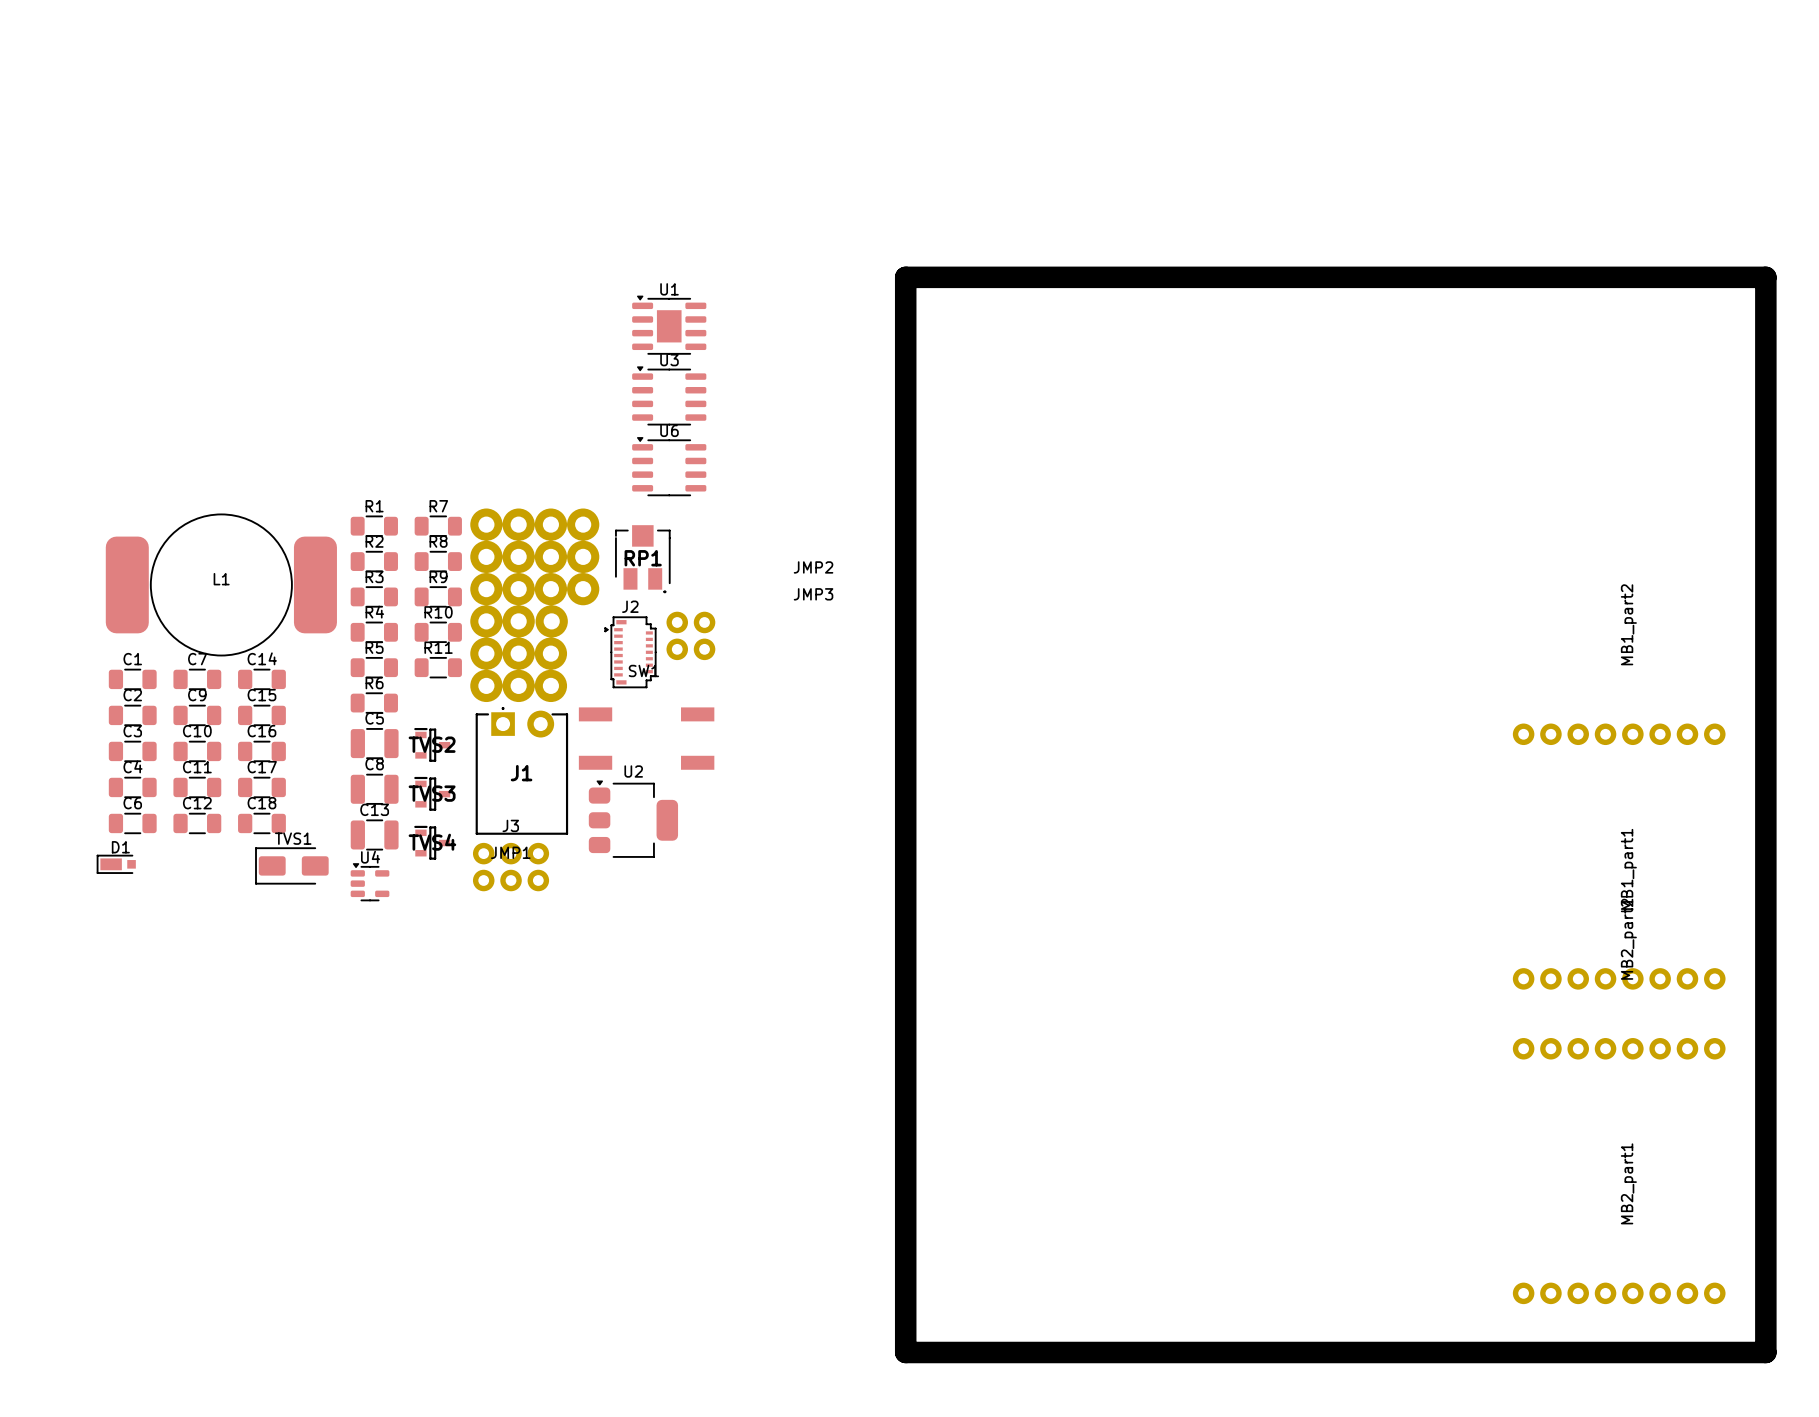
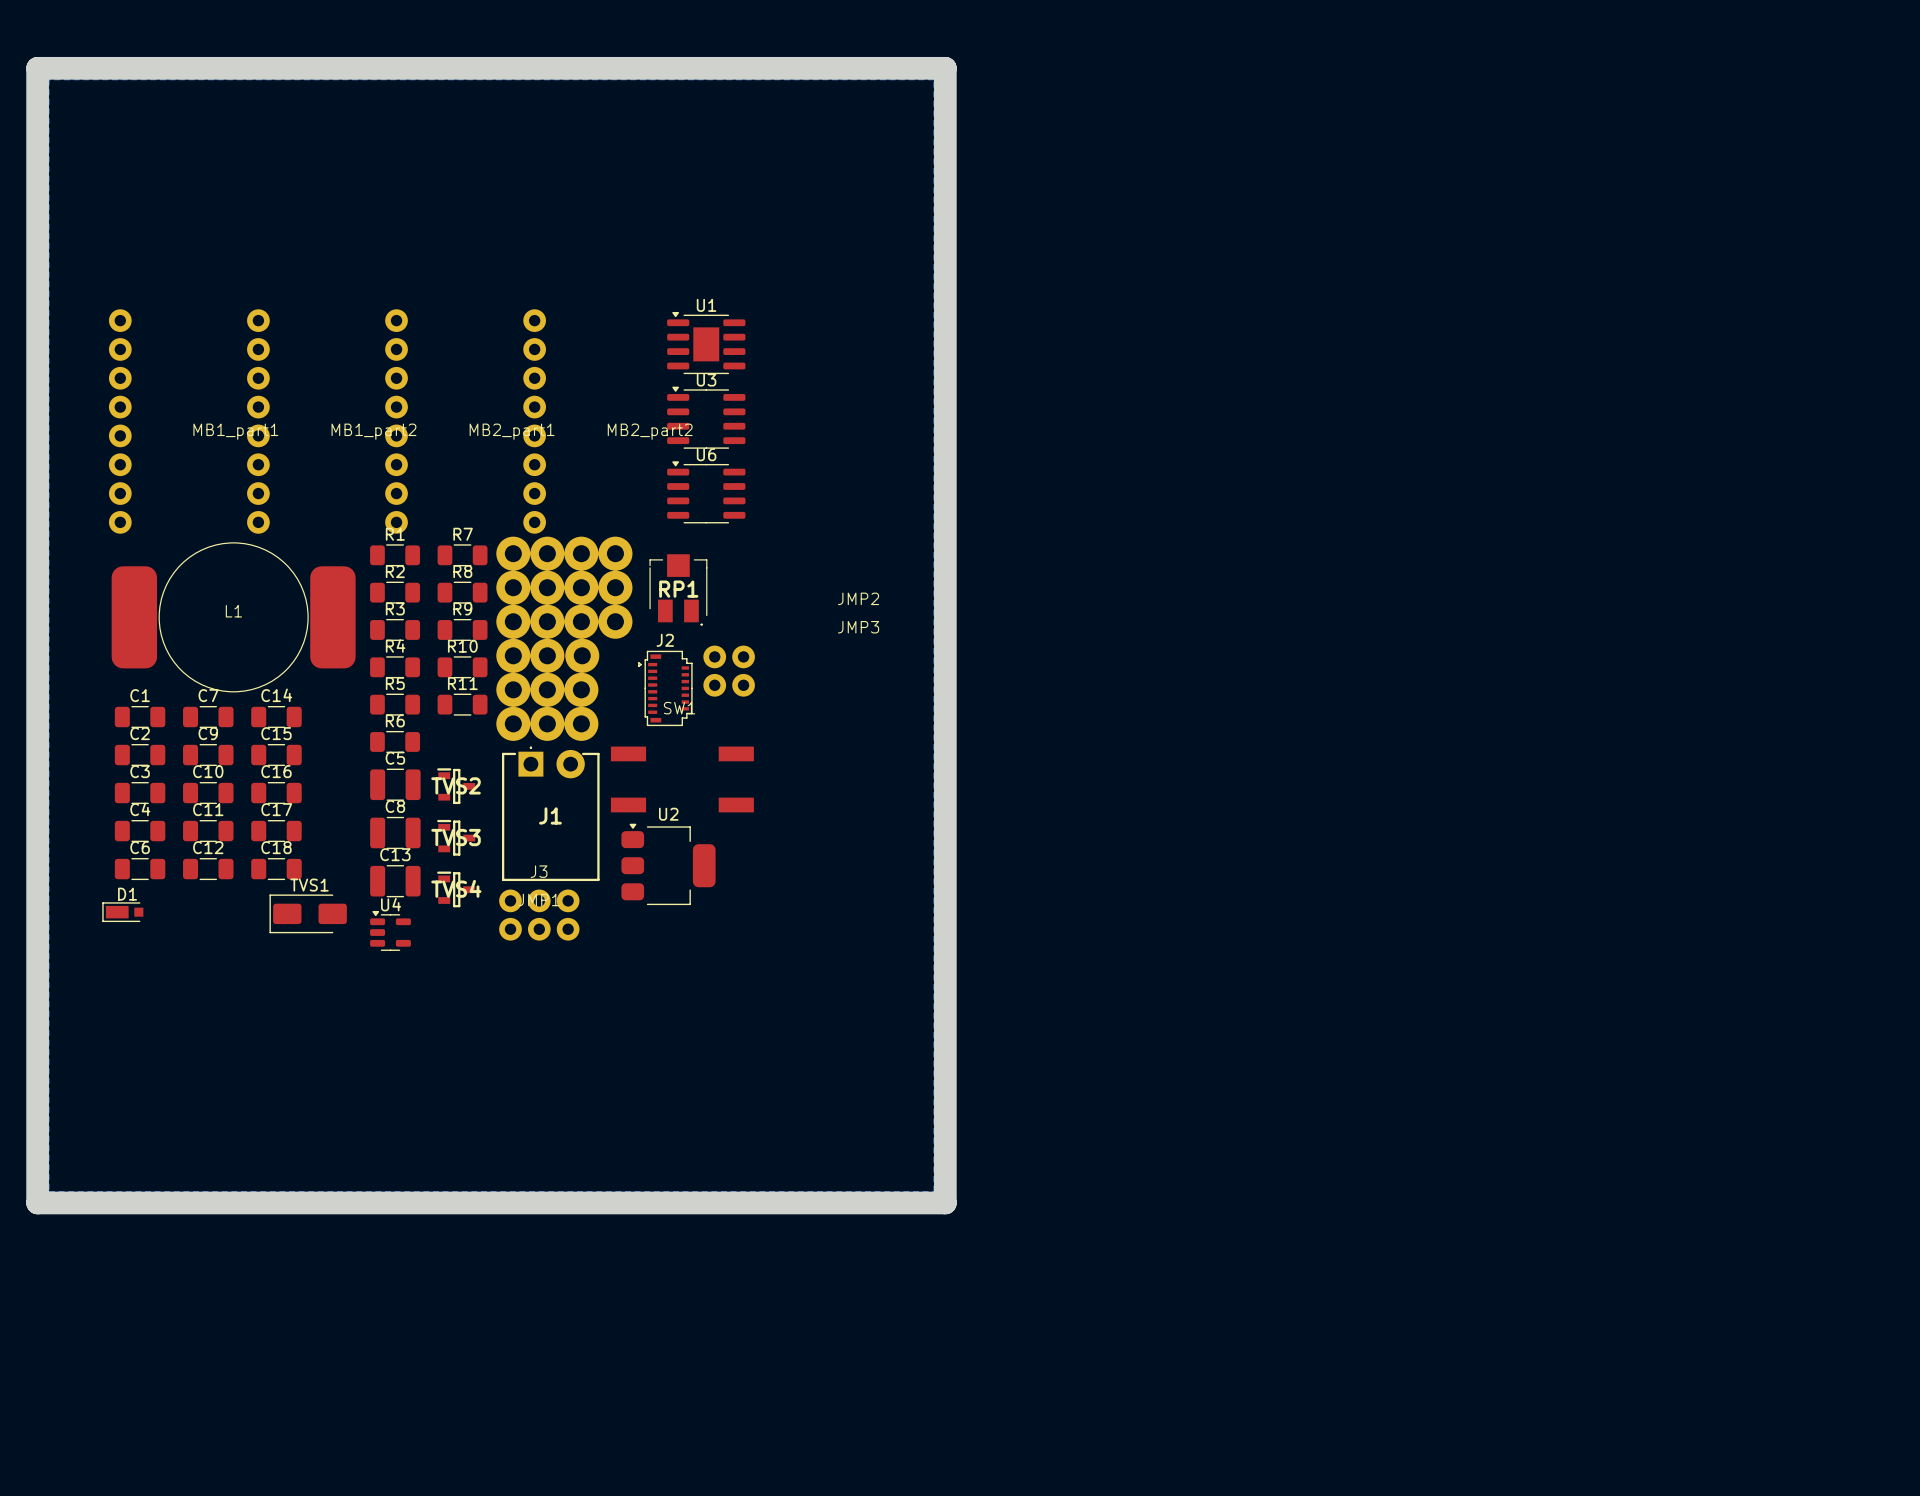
board edge: none -> (37, 68) (37, 1202) (945, 1202) (945, 68) (37, 68)
bottom zone outline: none -> (48, 79) (48, 1191) (934, 1191) (934, 79) (48, 79)
board edge: (905, 277) (905, 1352) (1765, 1352) (1765, 277) (905, 277) -> none
MB1_part2 rotation: 0° (1619, 734) -> 90° clockwise (258, 421)
MB1_part2 position: (1619, 734) -> (258, 421)
MB1_part1 rotation: 0° (1619, 978) -> 90° clockwise (120, 421)
MB1_part1 position: (1619, 978) -> (120, 421)
MB2_part2 rotation: 0° (1619, 1048) -> 90° clockwise (534, 421)
MB2_part2 position: (1619, 1048) -> (534, 421)
MB2_part1 rotation: 0° (1619, 1293) -> 90° clockwise (396, 421)
MB2_part1 position: (1619, 1293) -> (396, 421)

